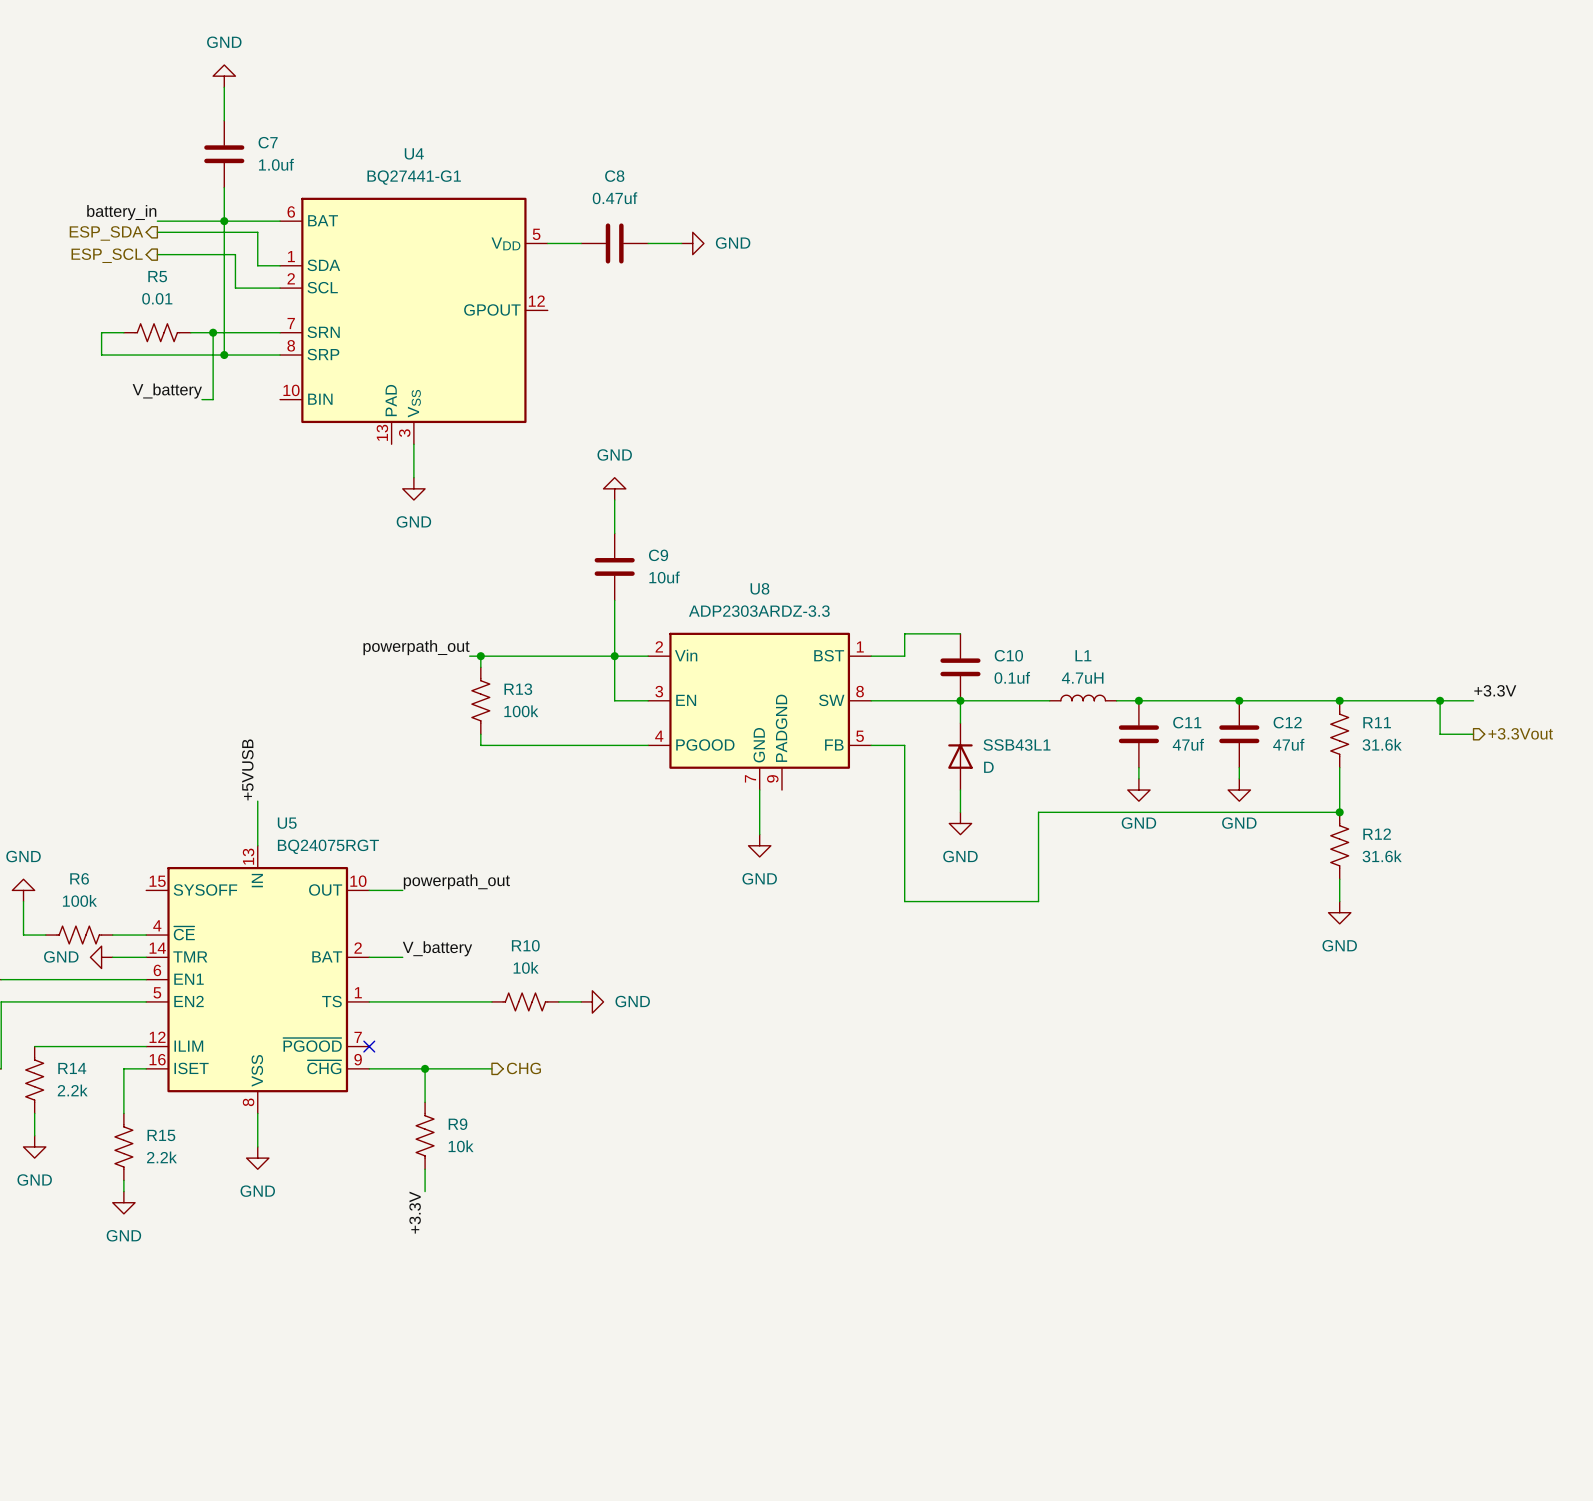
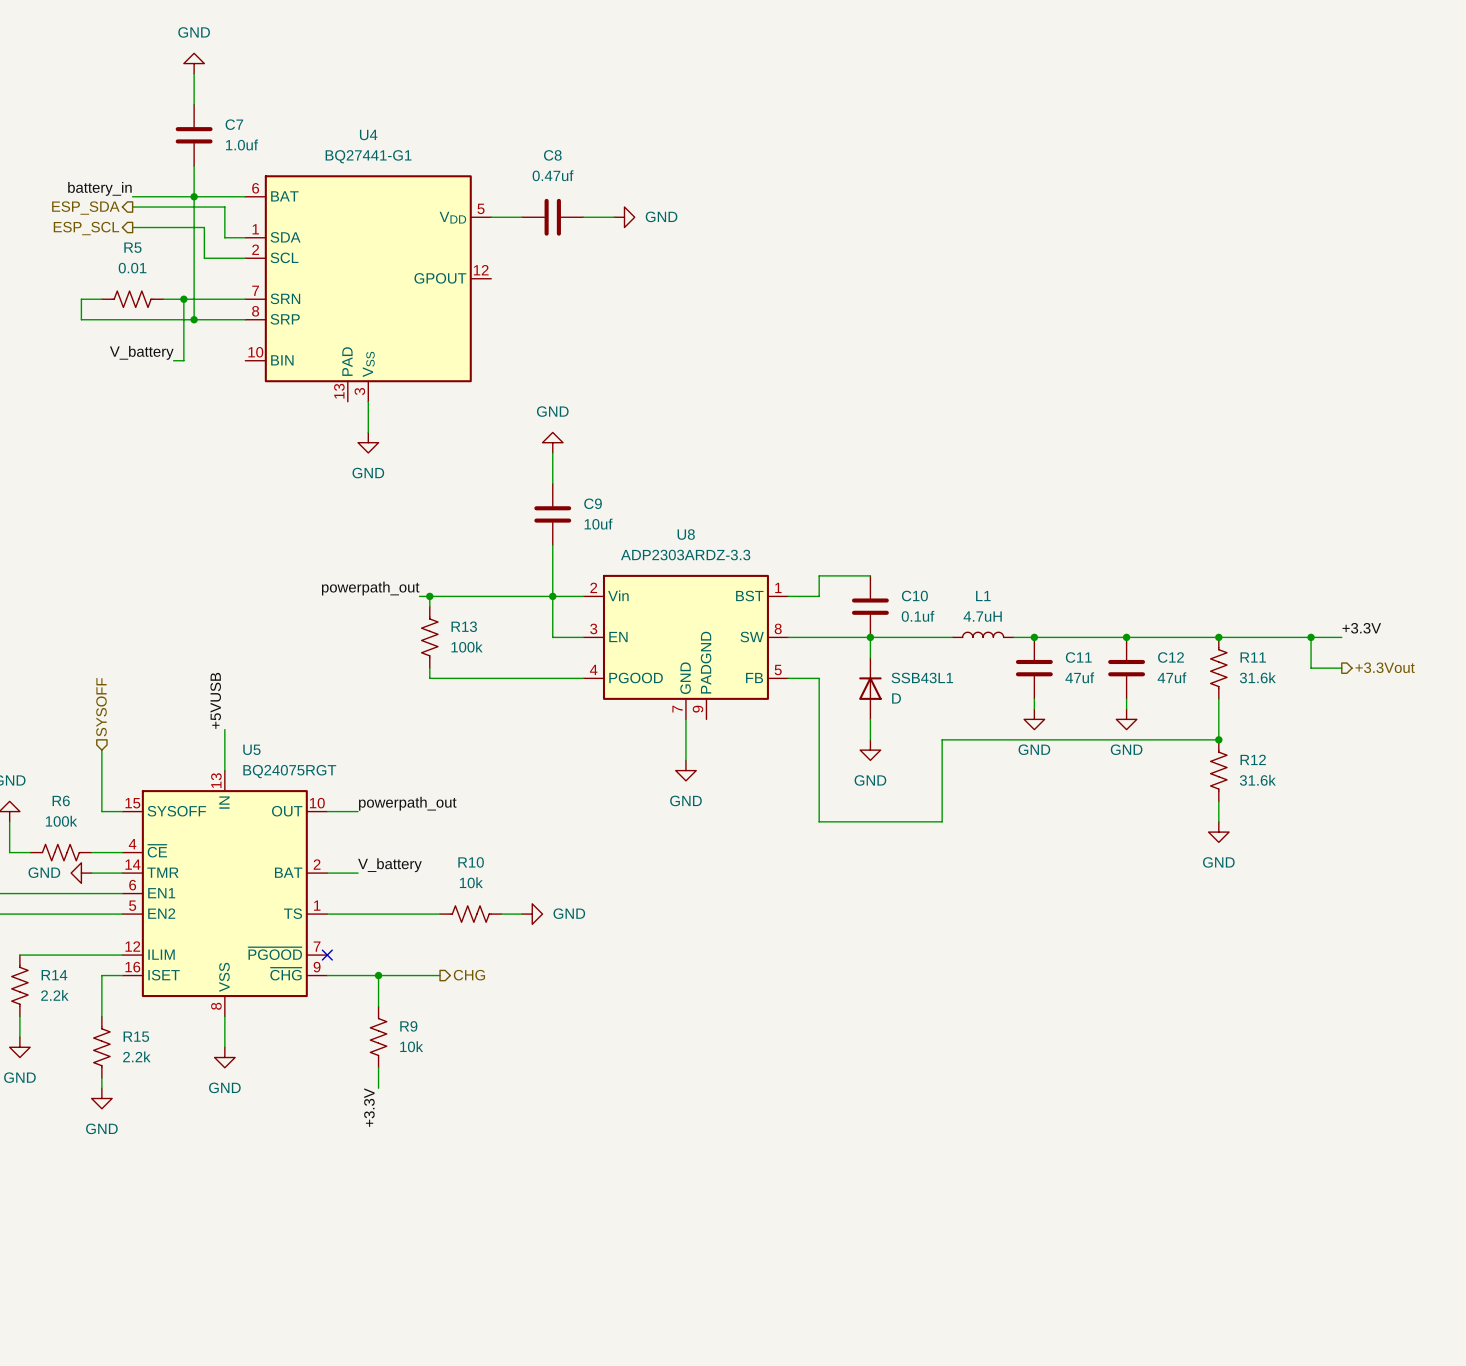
hierarchical label: none -> SYSOFF (101, 707)
wire: none -> (101, 750) (101, 811) (122, 811)

